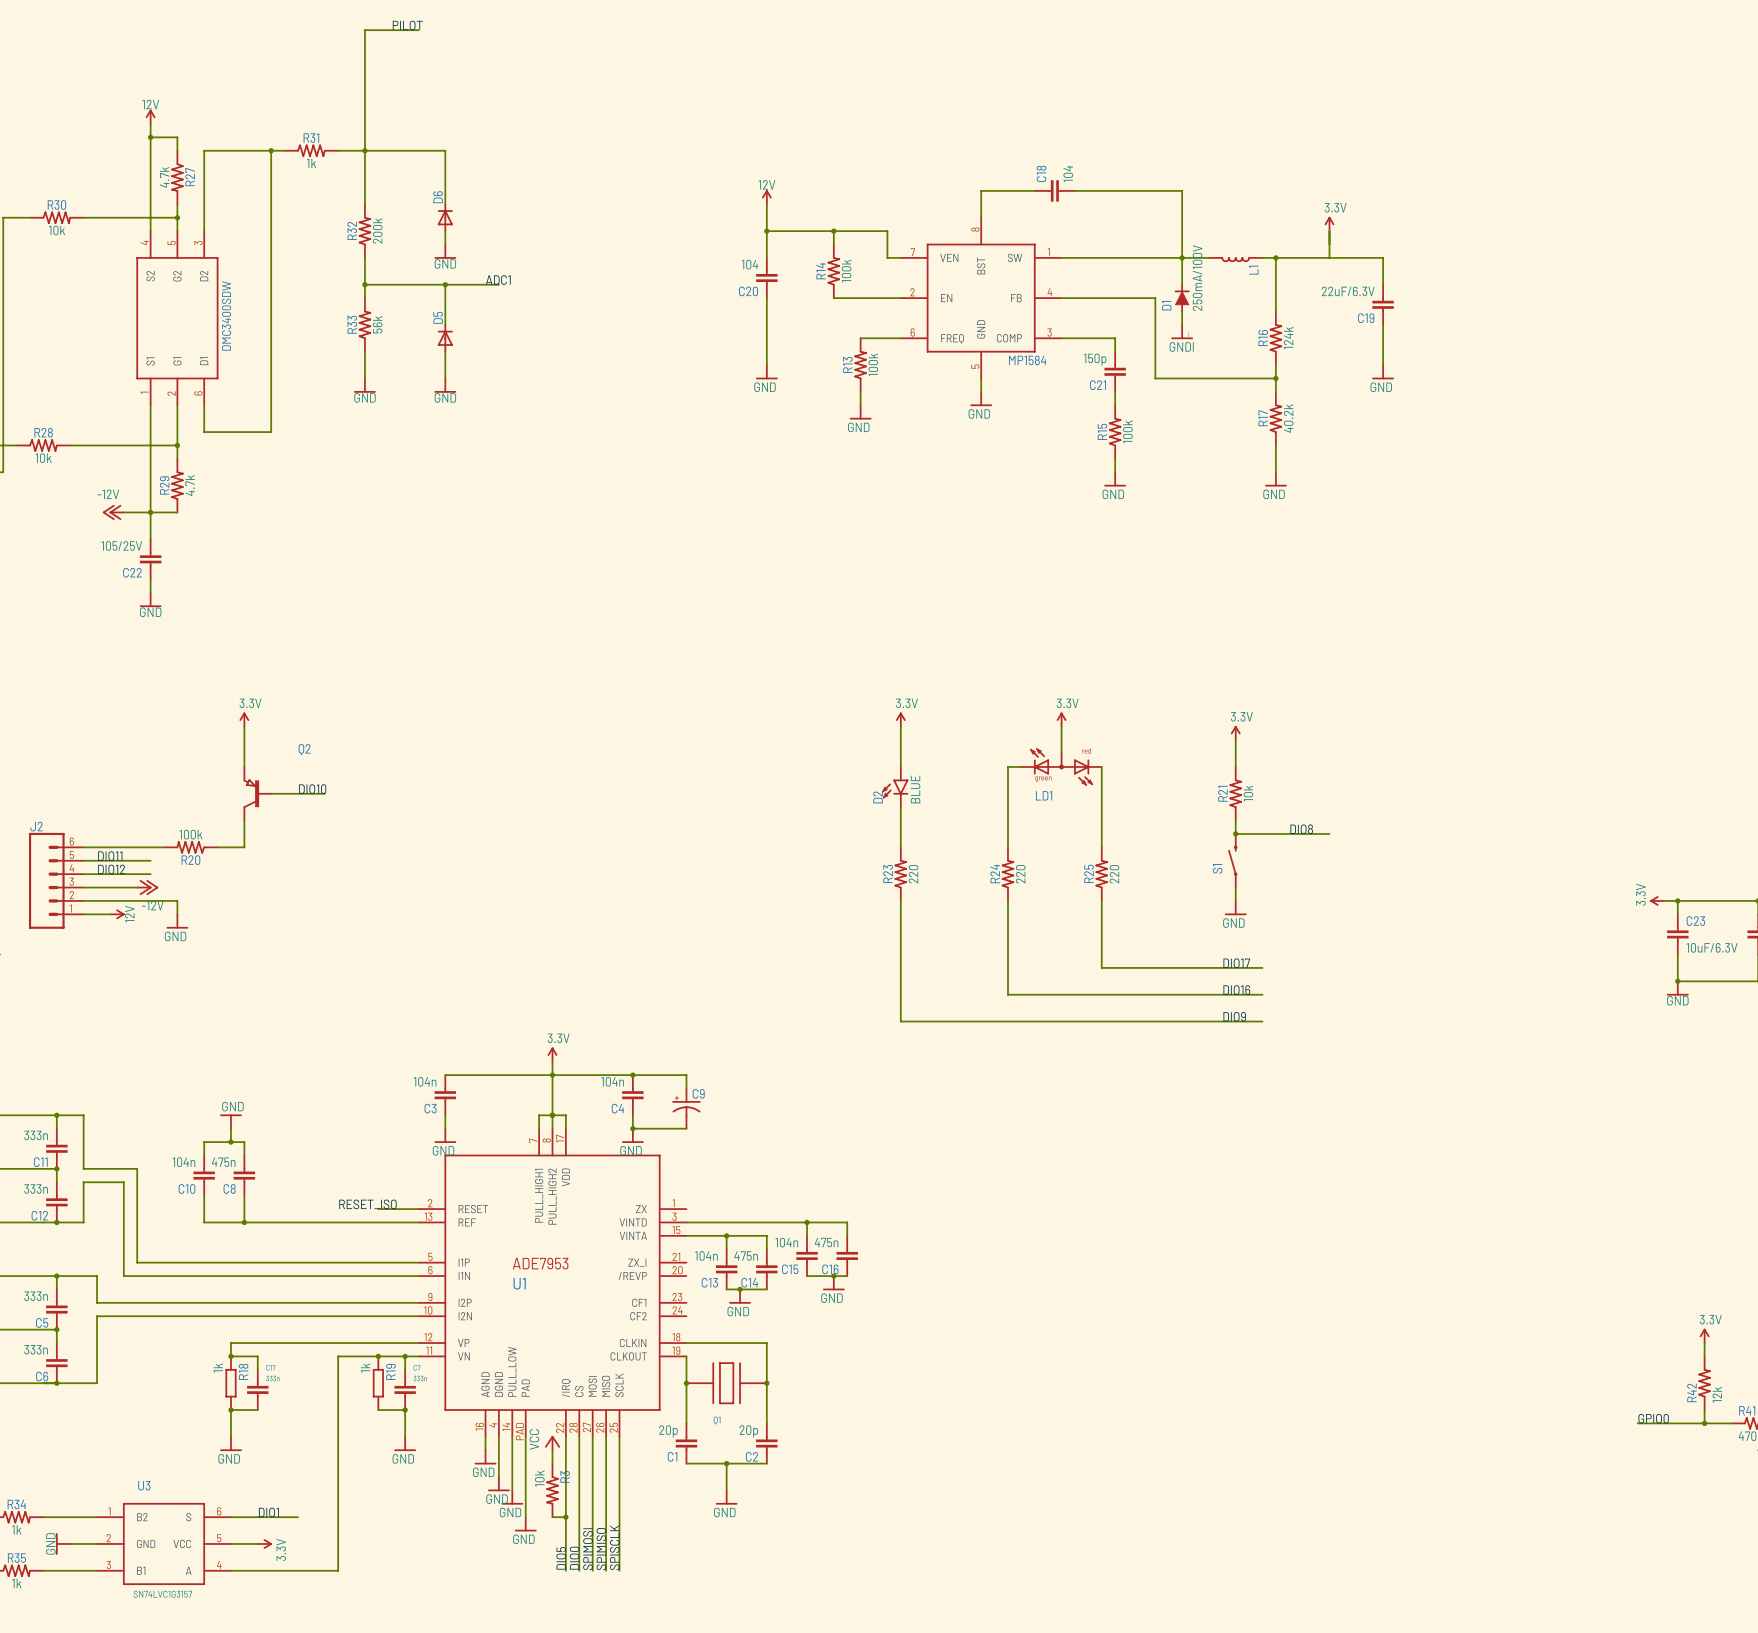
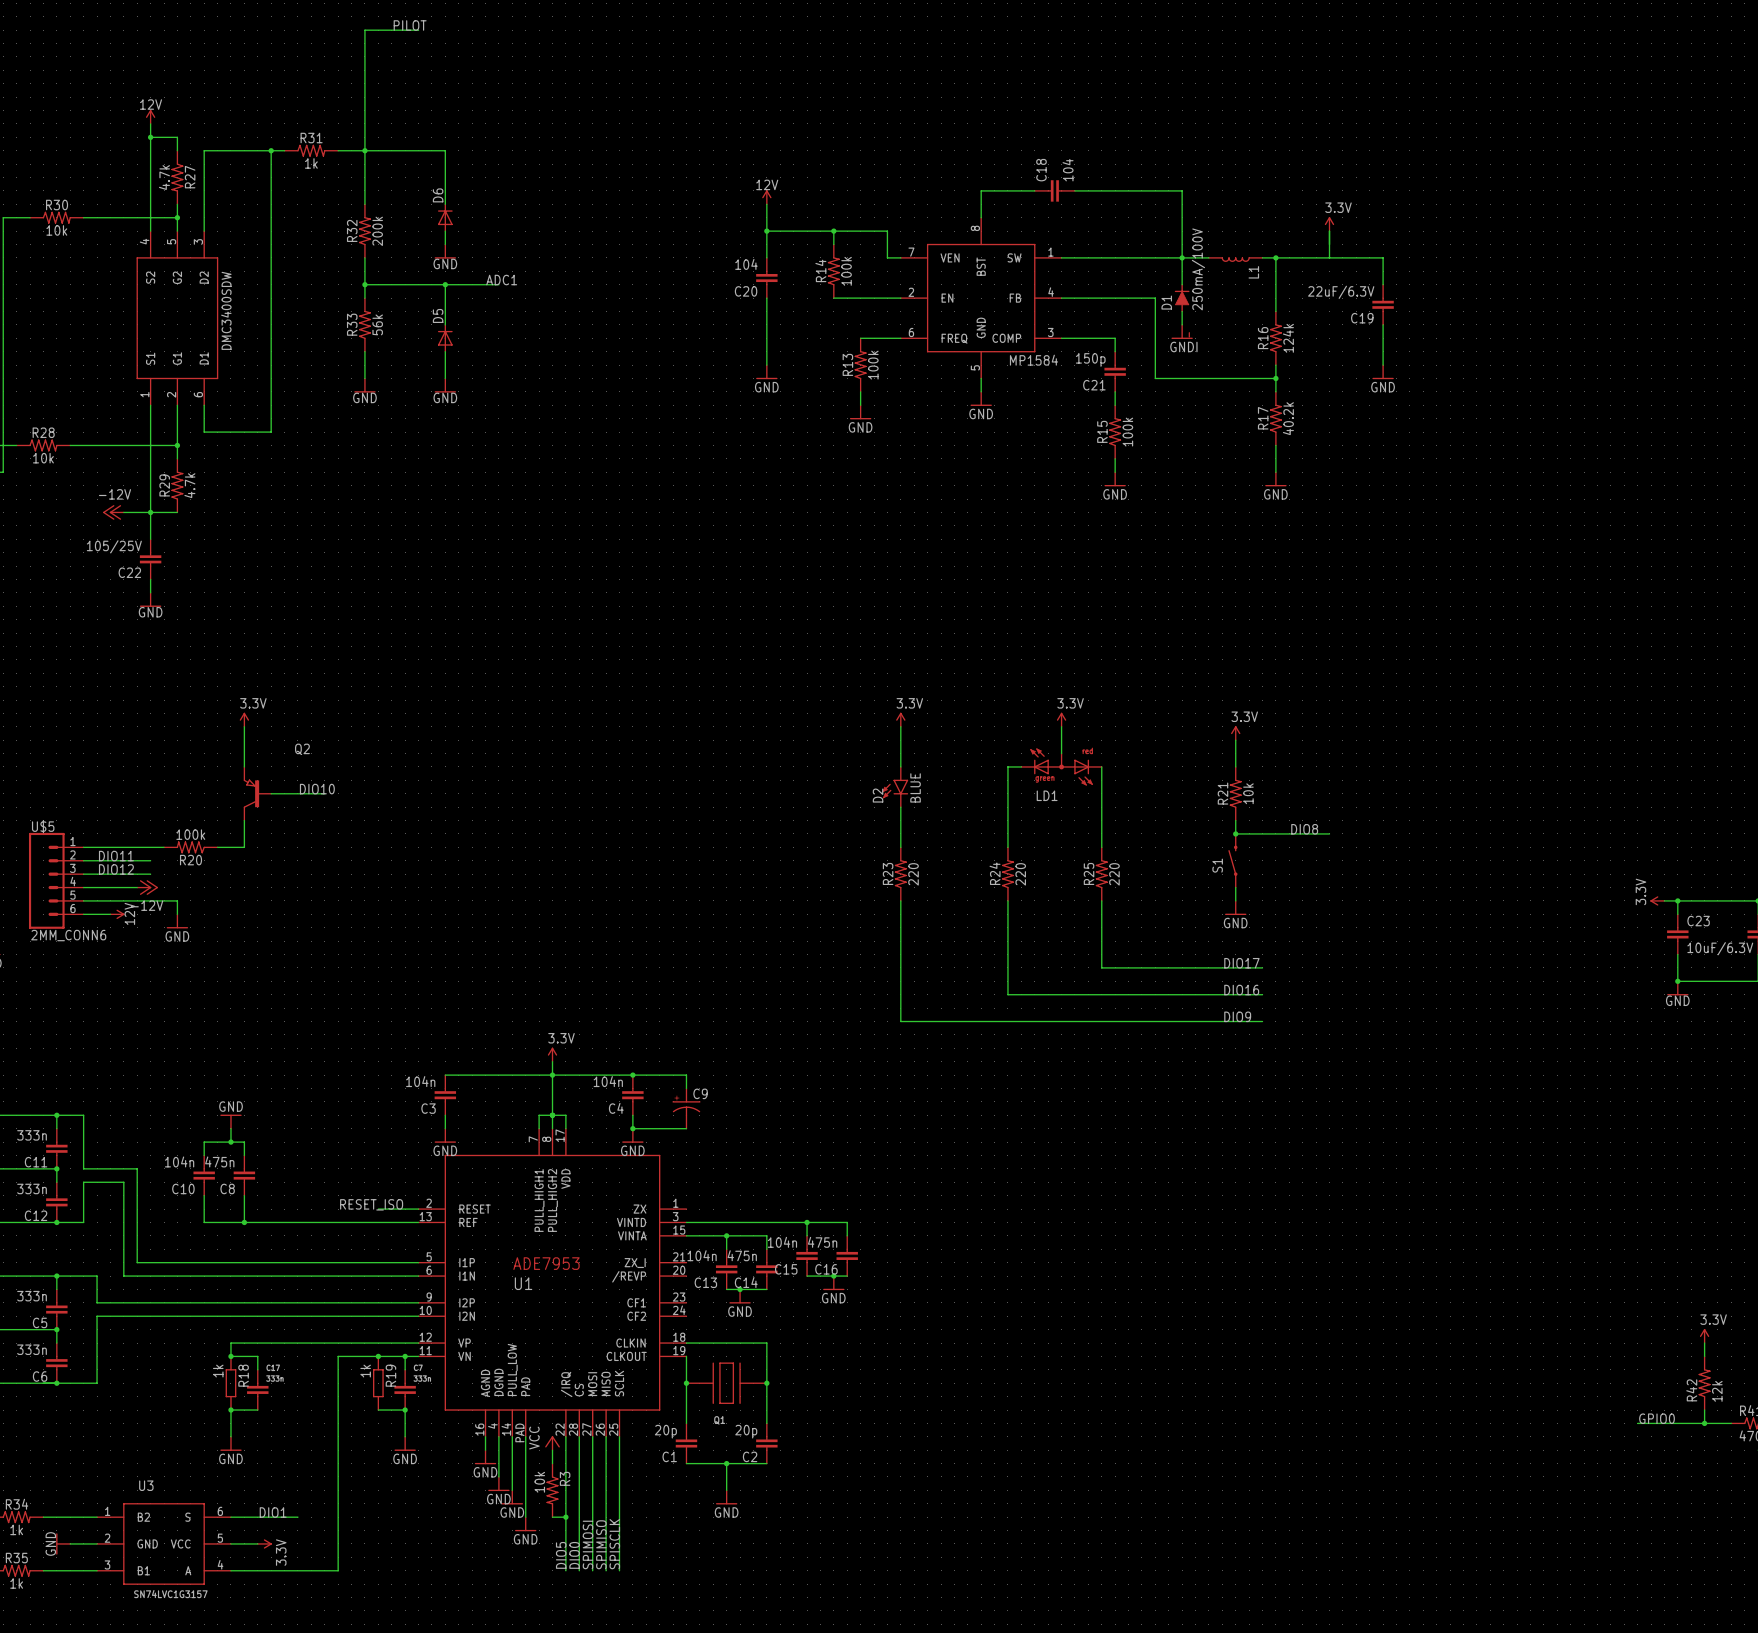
J2 name: J2 (36, 826) -> U$5 (43, 826)
J2 flip: as is (46, 880) -> up-down (46, 880)
J2 value: none -> 2MM_CONN6 (68, 935)

